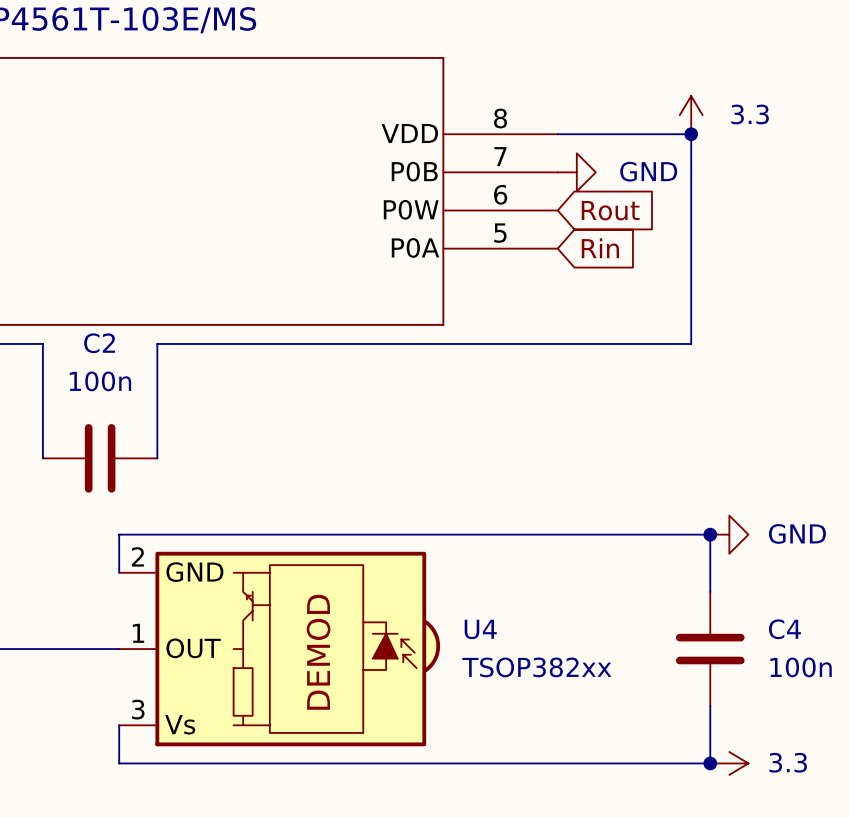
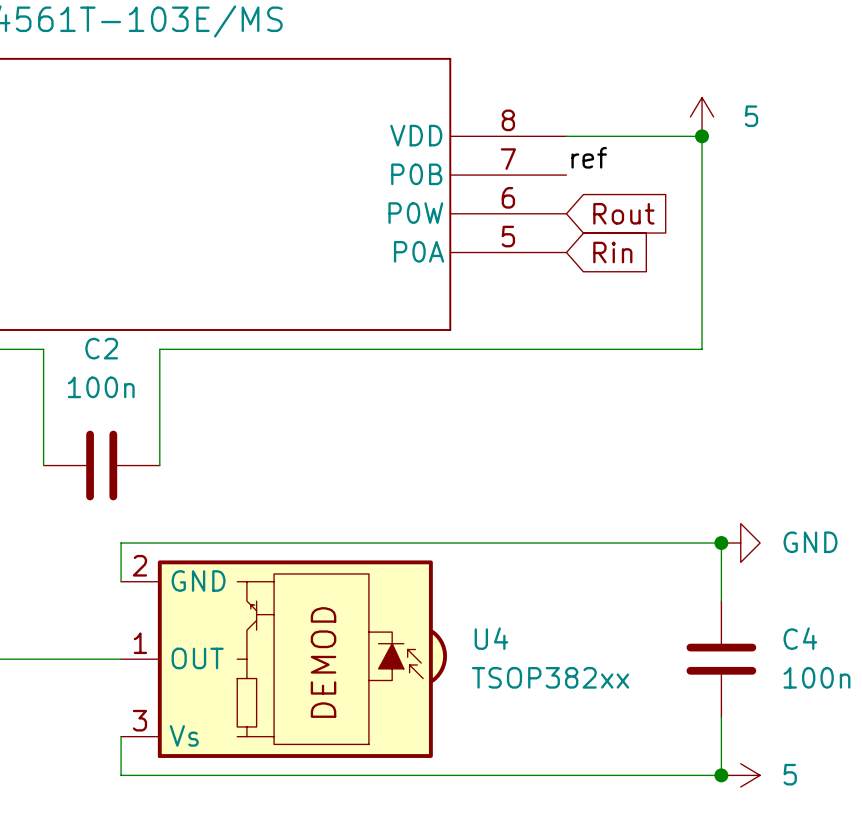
power symbol: 3.3 (691, 115) -> 5 (702, 116)
label: none -> ref (589, 157)
power symbol: GND (576, 172) -> none
power symbol: 3.3 (729, 763) -> 5 (740, 775)

